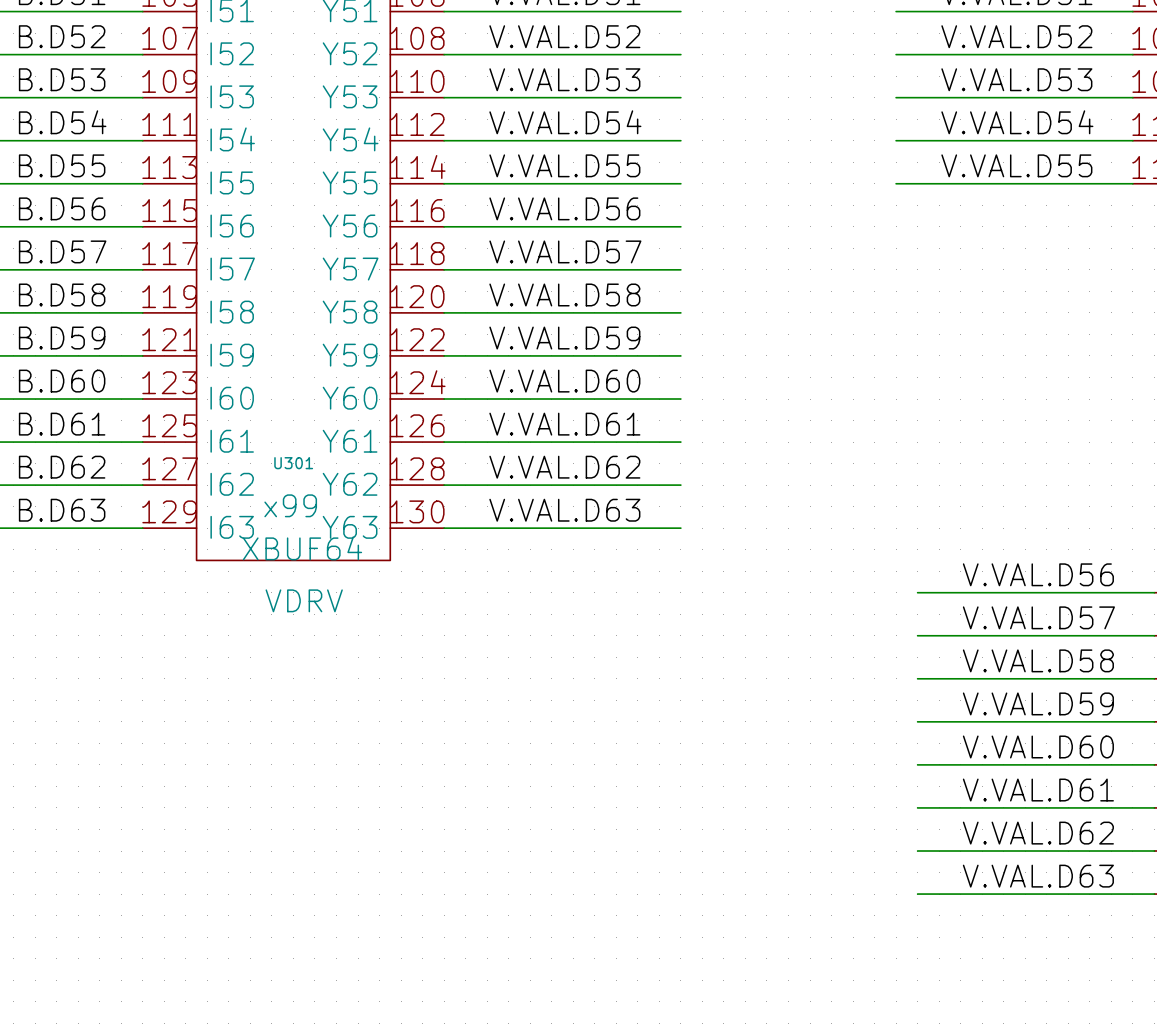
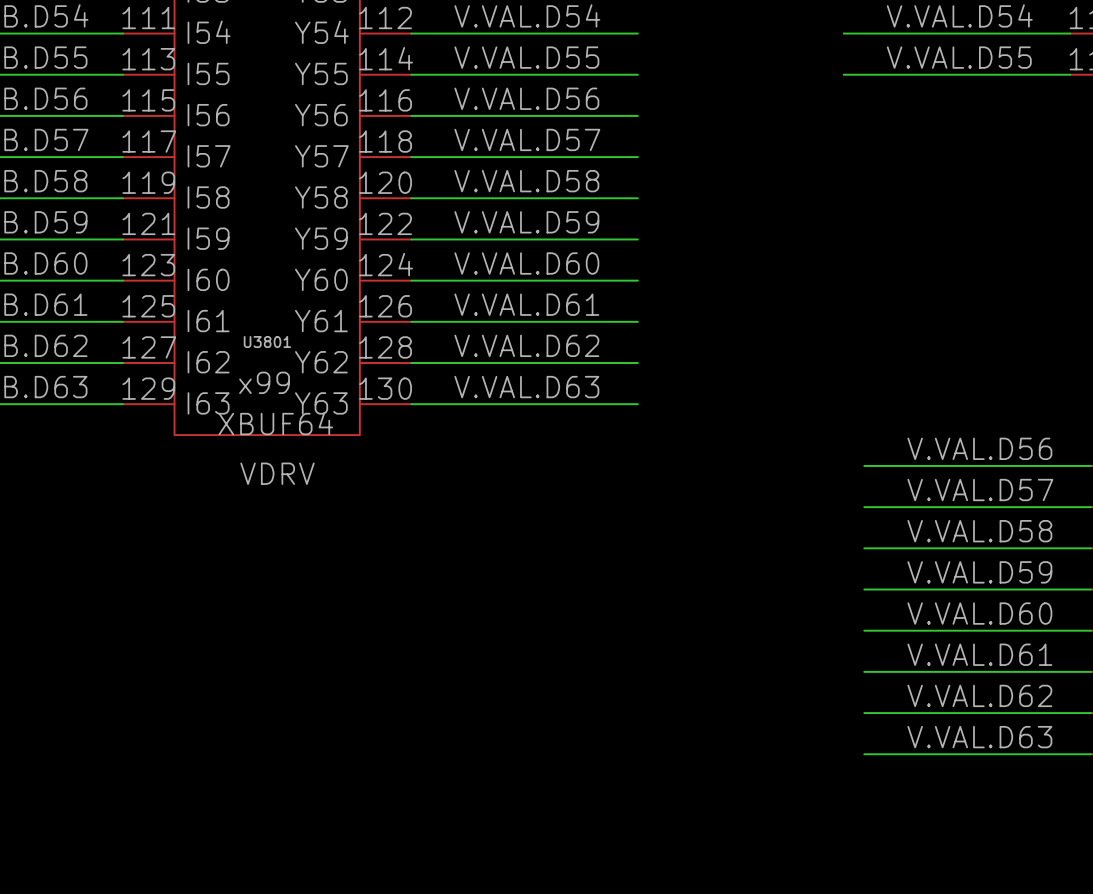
U301 name: U301 (293, 463) -> U3801 (267, 342)

